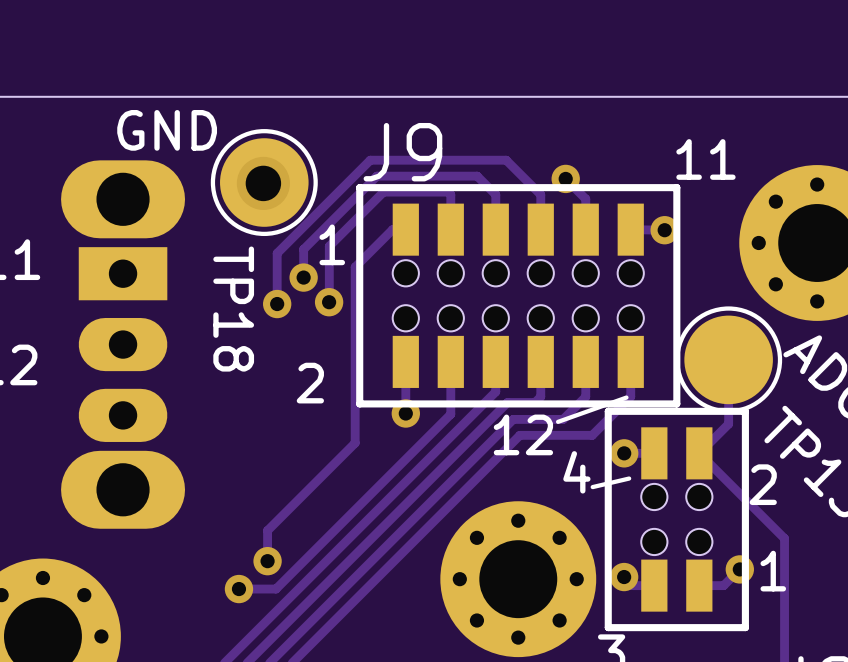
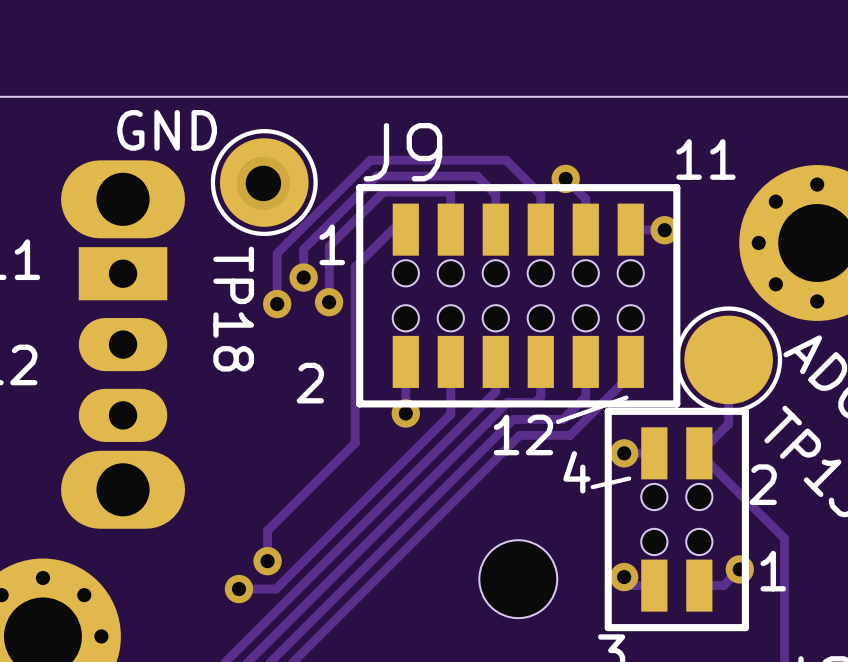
track: (630, 374) (630, 396) (592, 435) (570, 435) -> (630, 374) (570, 435)
part footprint: [440, 501, 597, 658] -> [479, 540, 558, 619]

